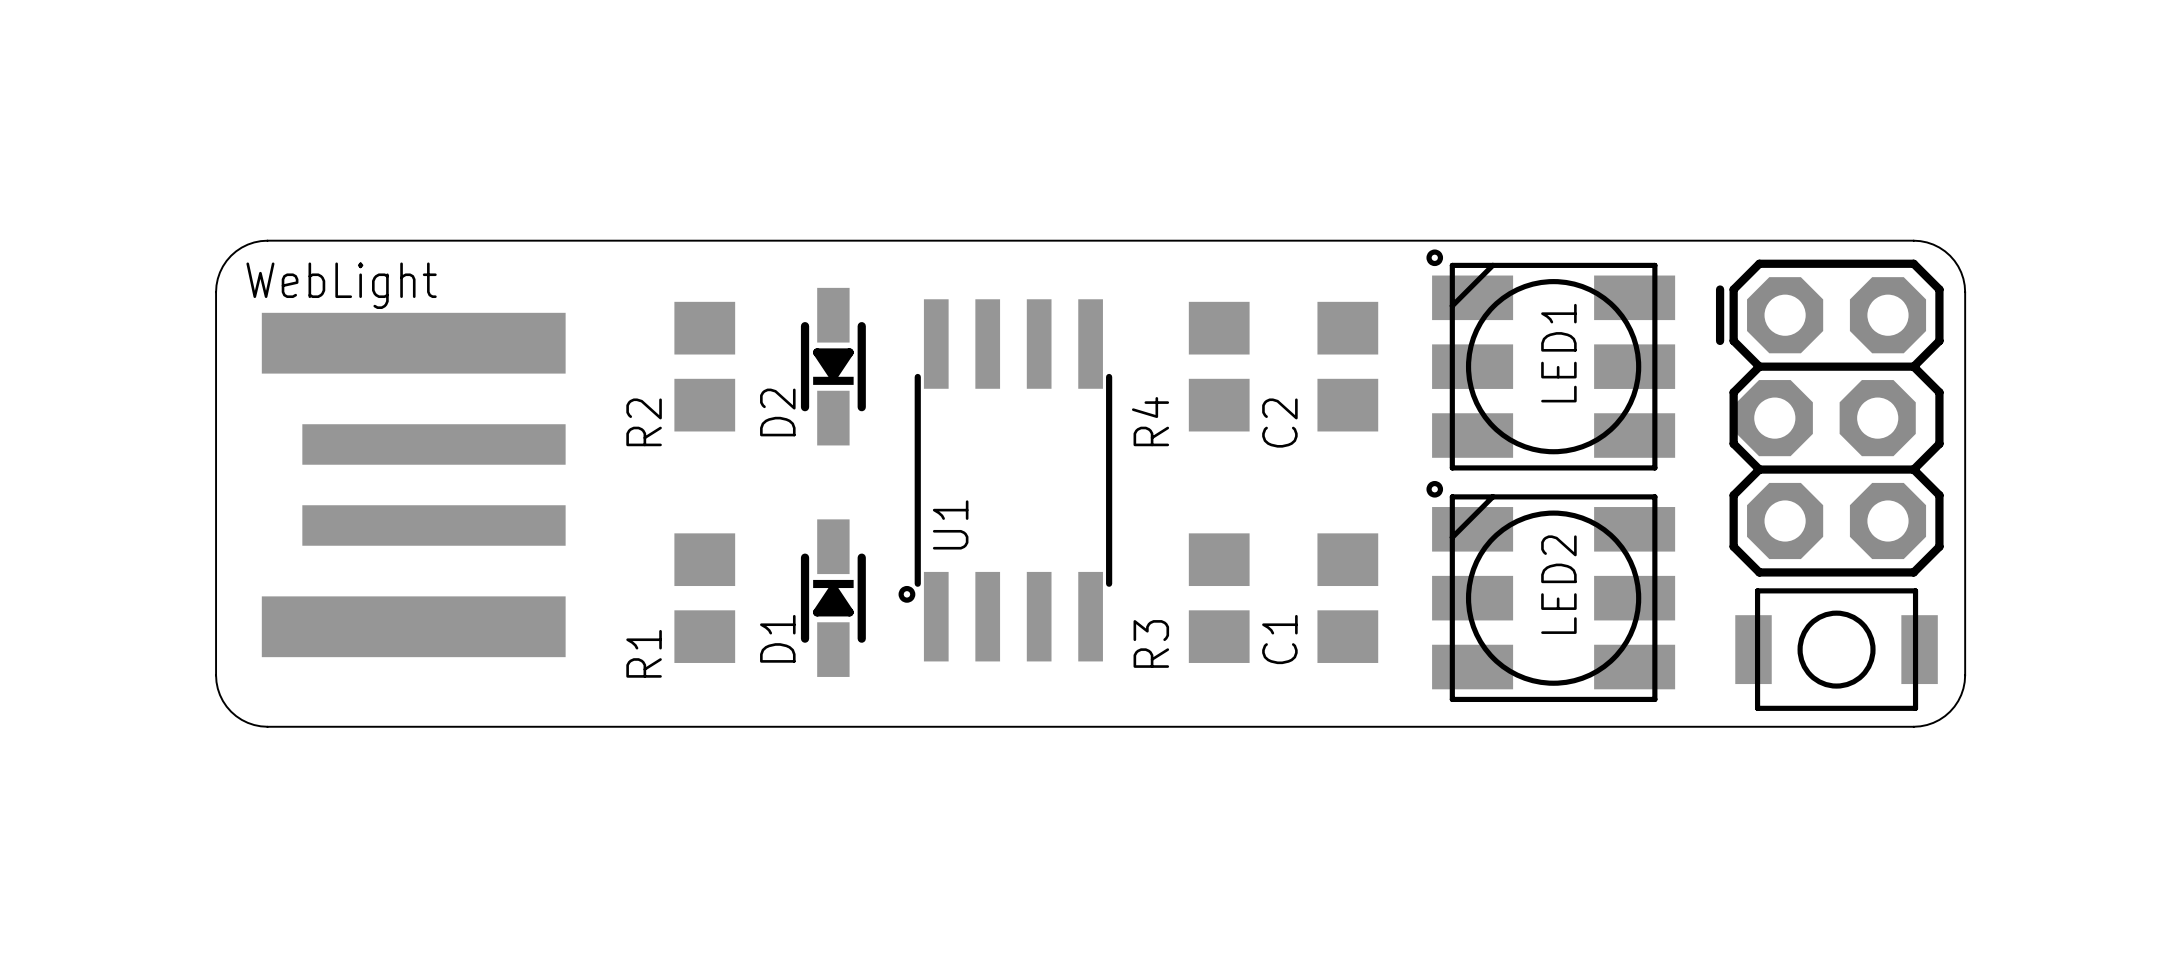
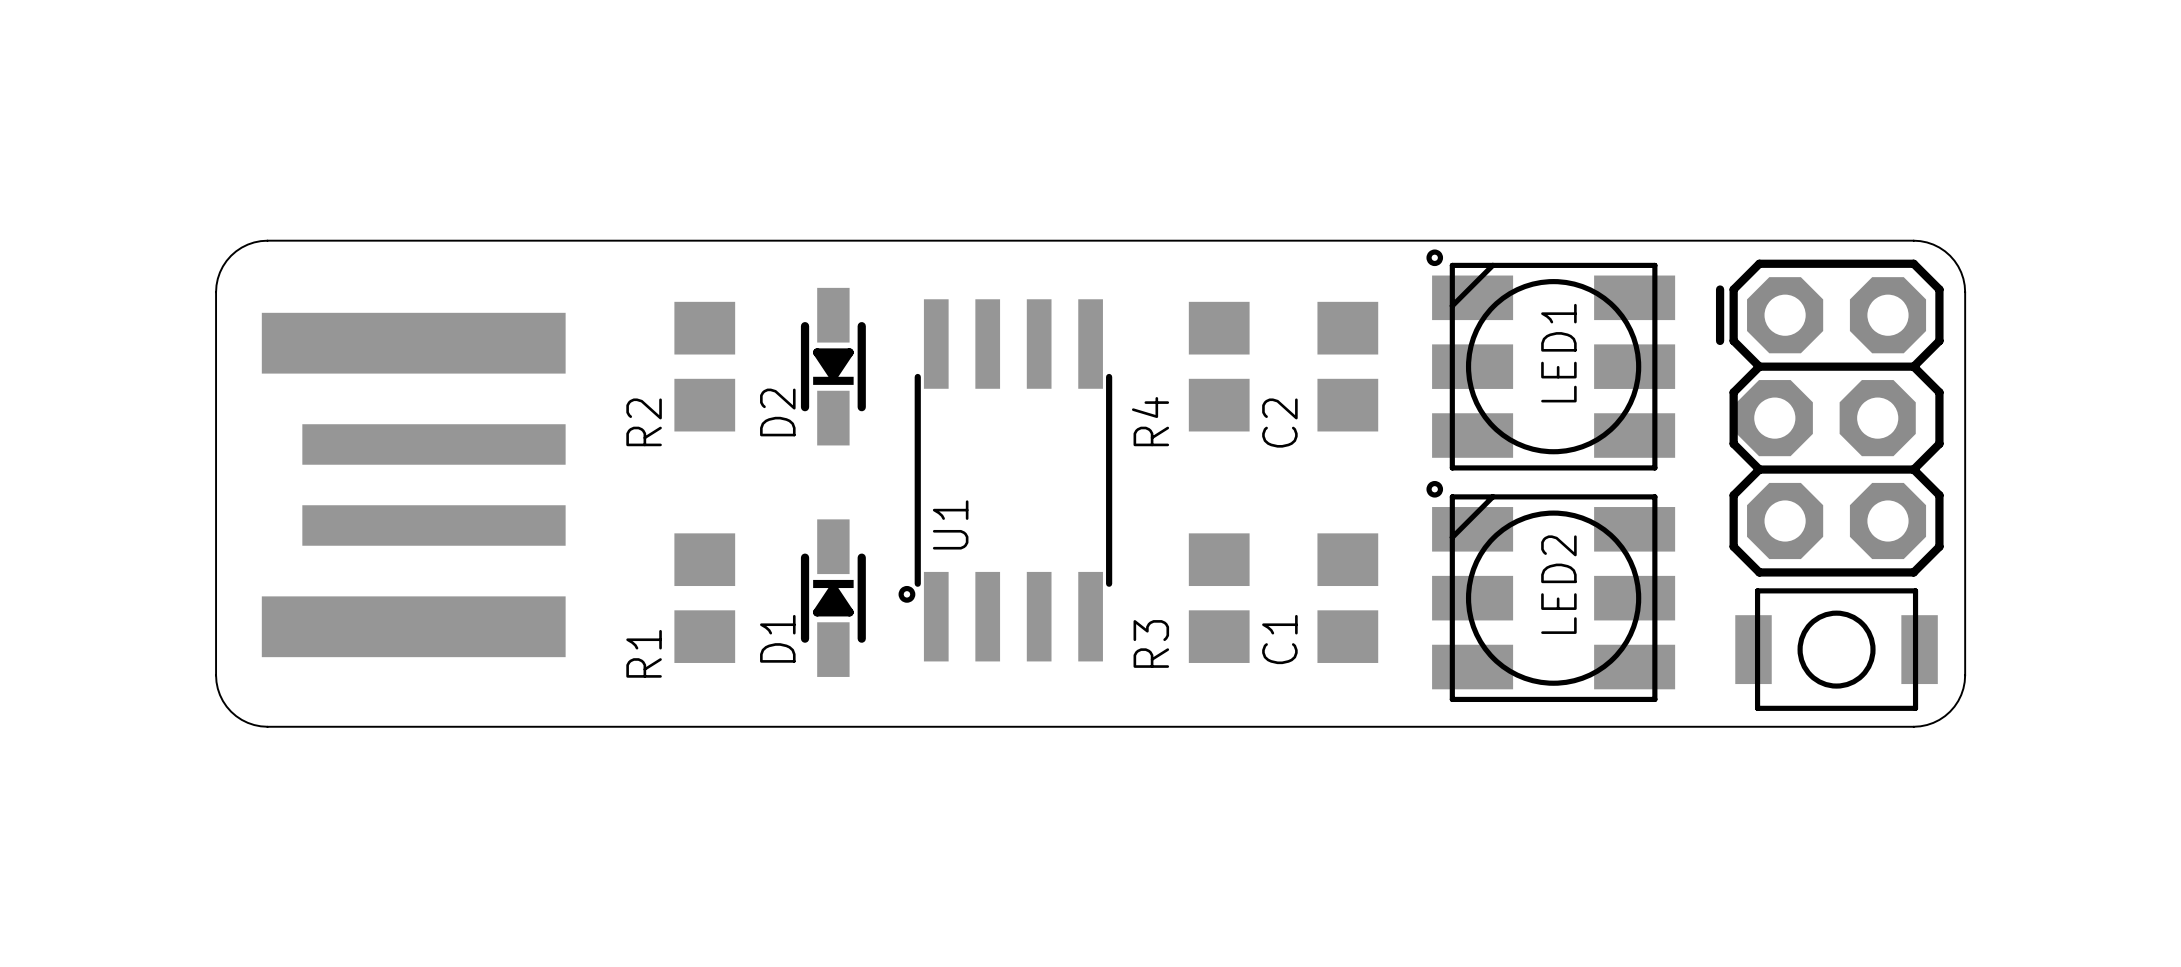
text: WebLight (341, 285) -> none

